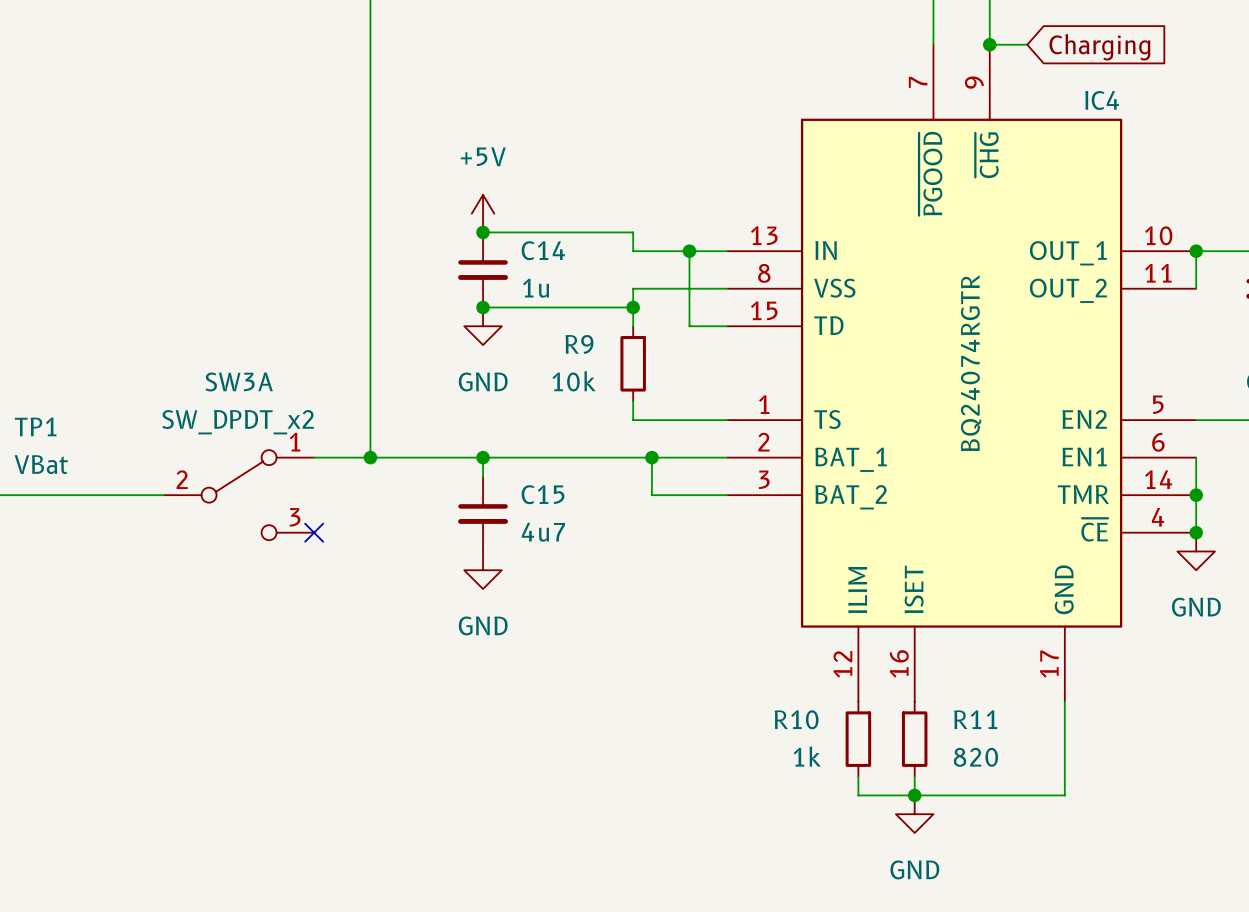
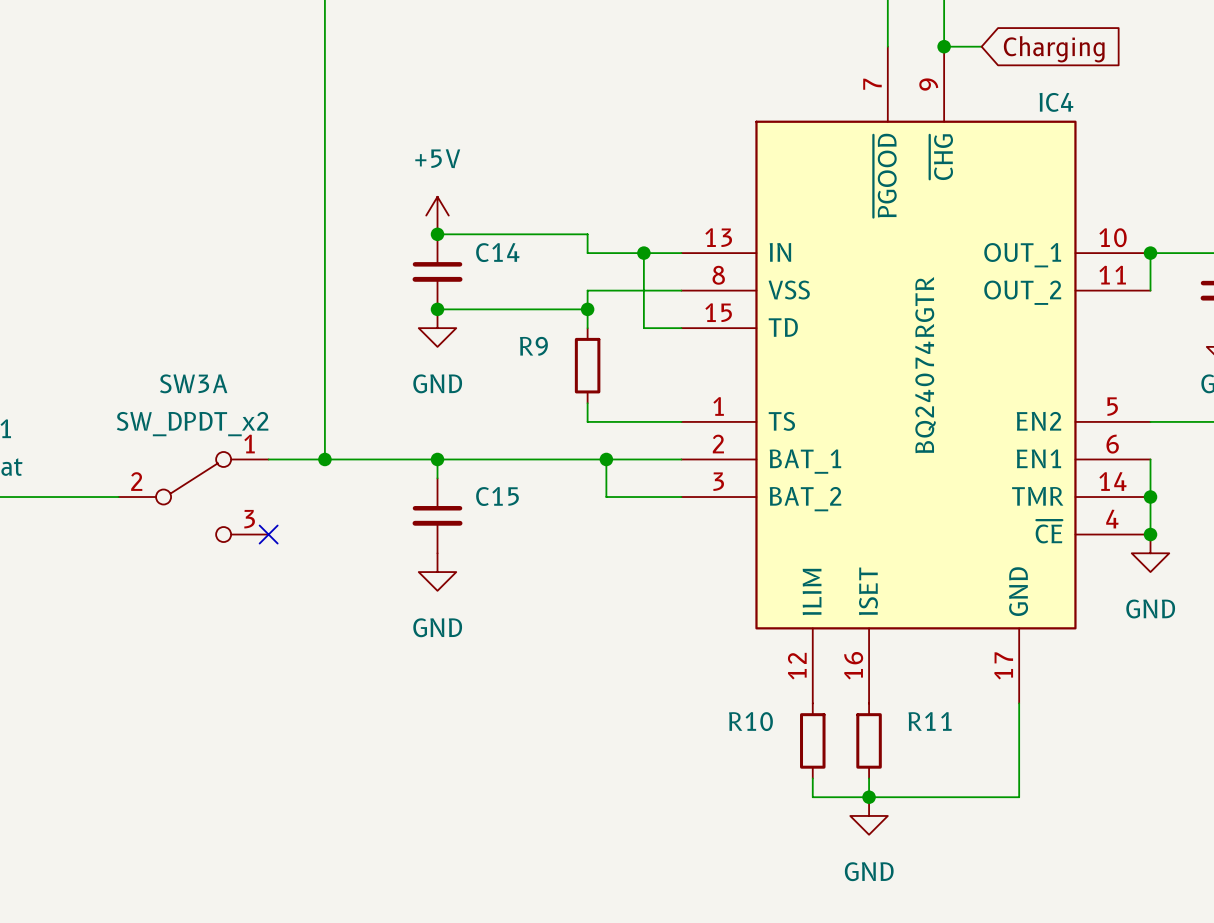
C14 value: 1u (535, 288) -> none
R9 value: 10k (574, 381) -> none
C15 value: 4u7 (543, 532) -> none
R10 value: 1k (807, 756) -> none
R11 value: 820 (975, 757) -> none

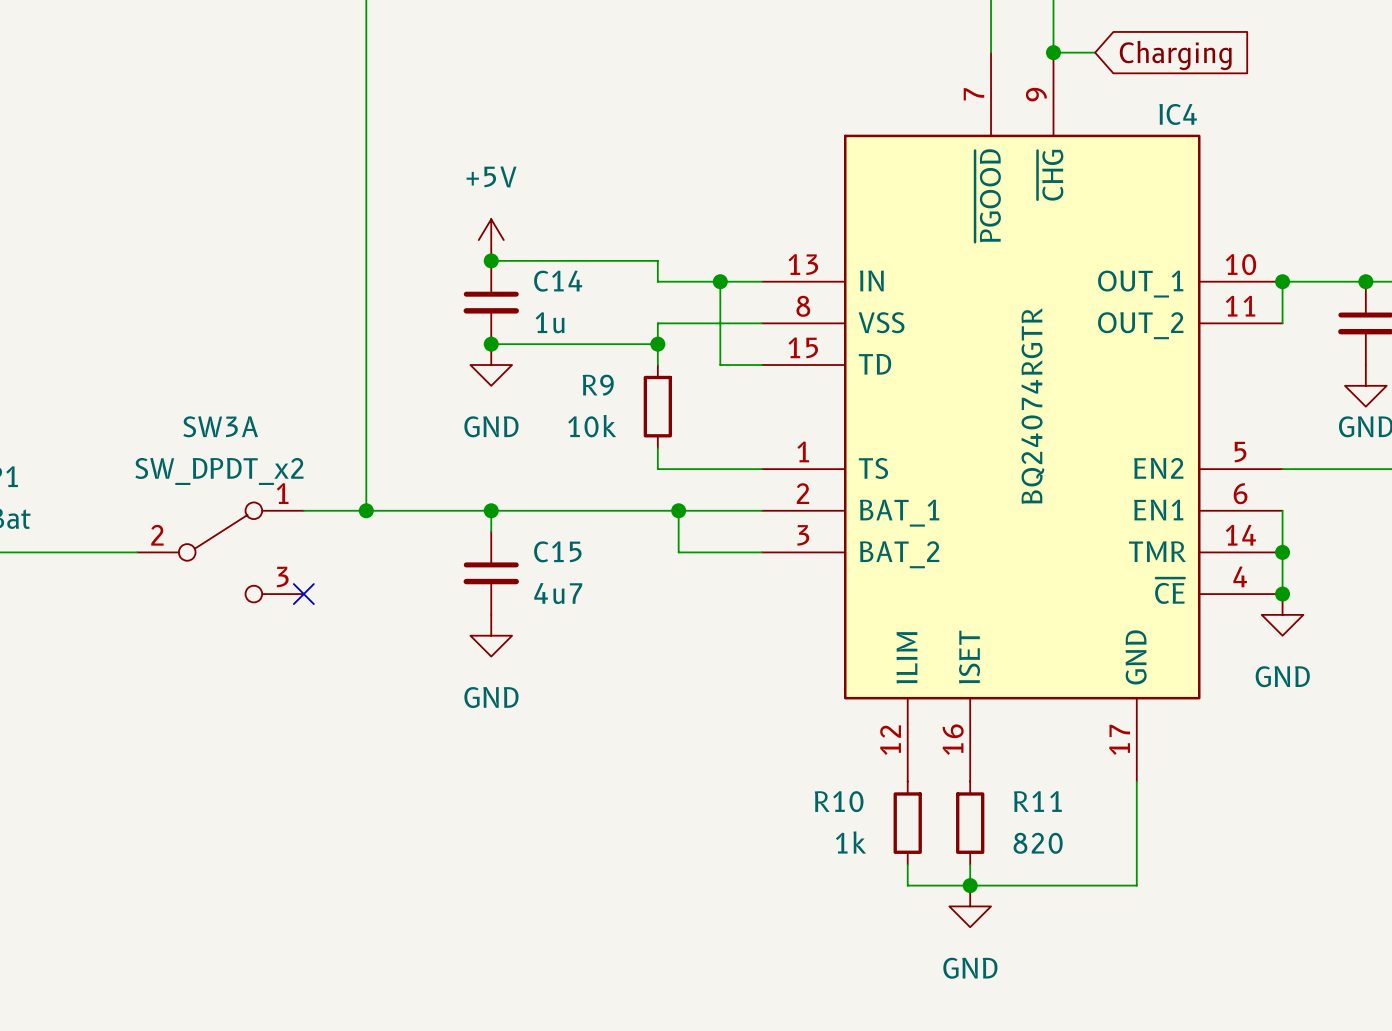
C14 value: none -> 1u (550, 322)
R9 value: none -> 10k (592, 426)
C15 value: none -> 4u7 (558, 593)
R10 value: none -> 1k (850, 842)
R11 value: none -> 820 (1038, 843)

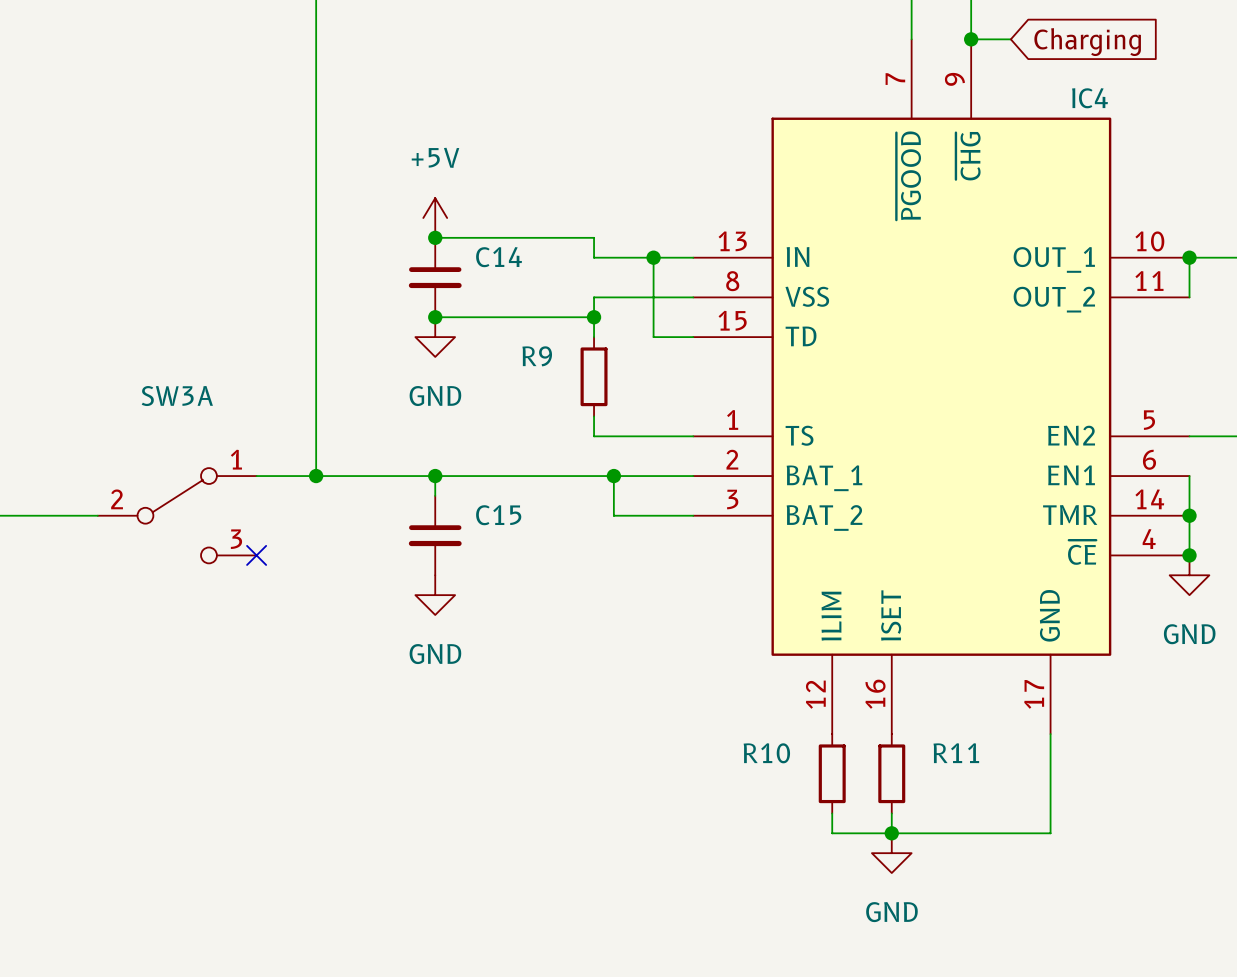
C14 value: 1u (550, 322) -> none
IC4 value: BQ24074RGTR (1032, 406) -> none
R9 value: 10k (592, 426) -> none
SW3A value: SW_DPDT_x2 (219, 471) -> none
C15 value: 4u7 (558, 593) -> none
R10 value: 1k (850, 842) -> none
R11 value: 820 (1038, 843) -> none

